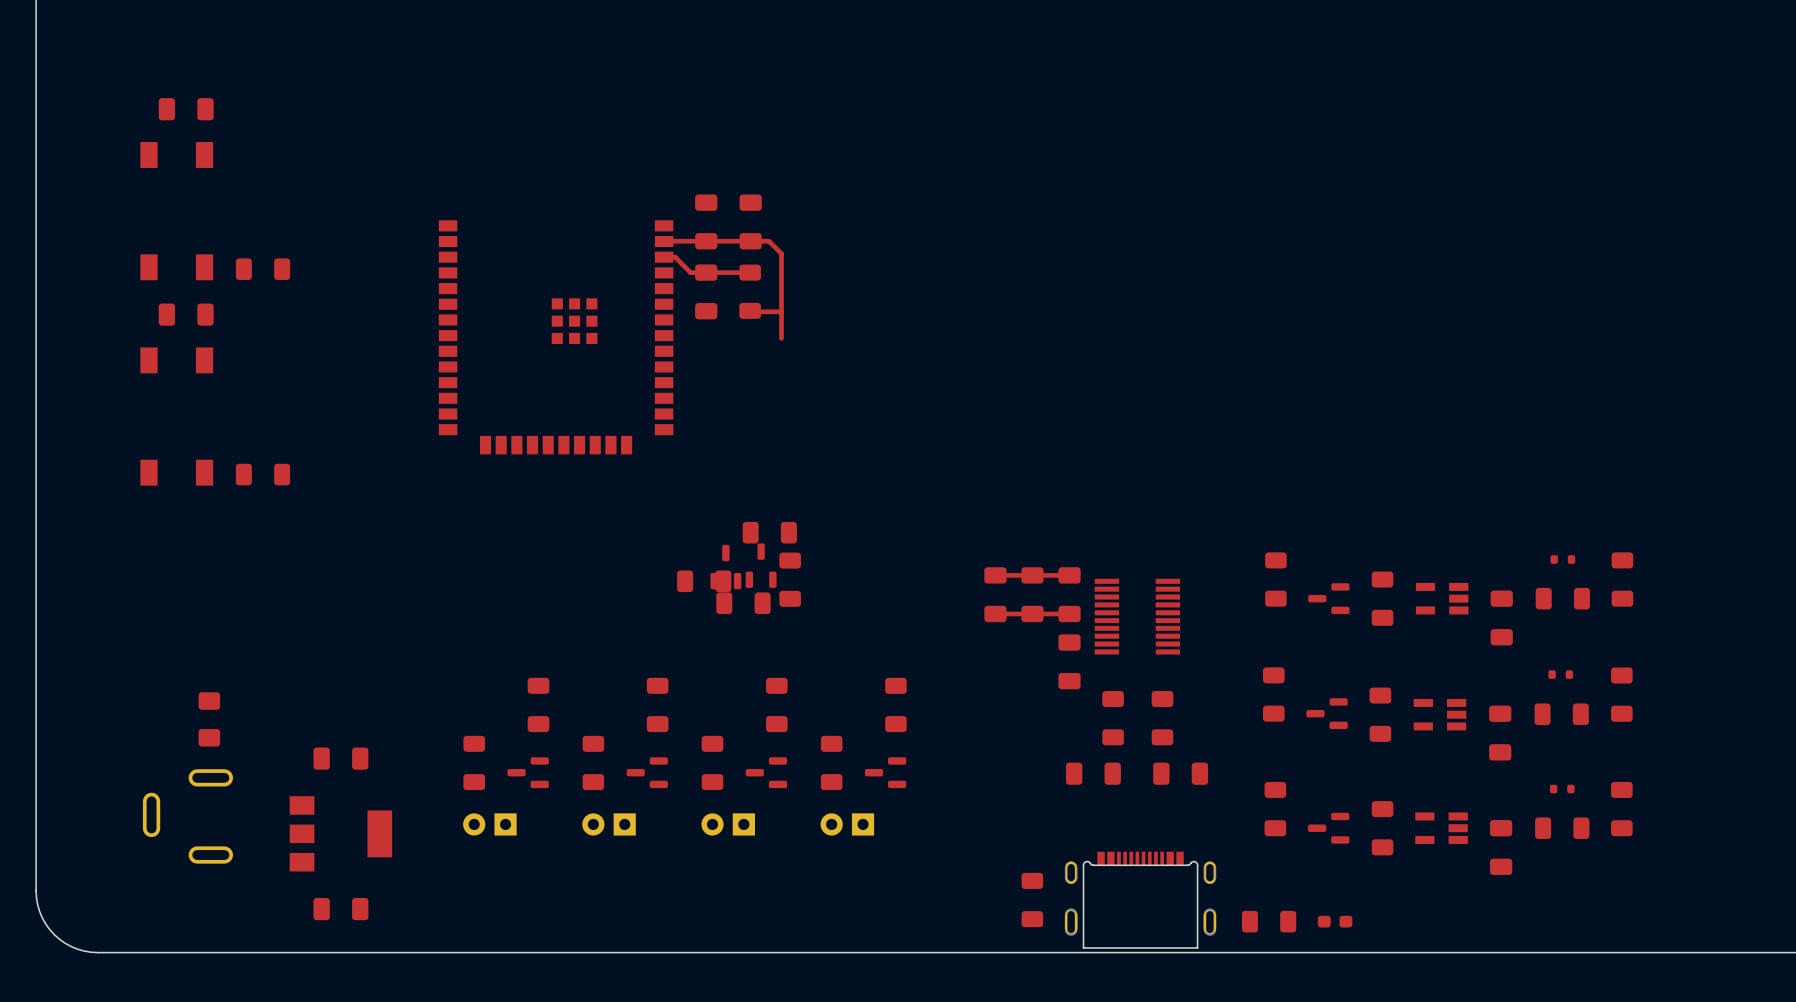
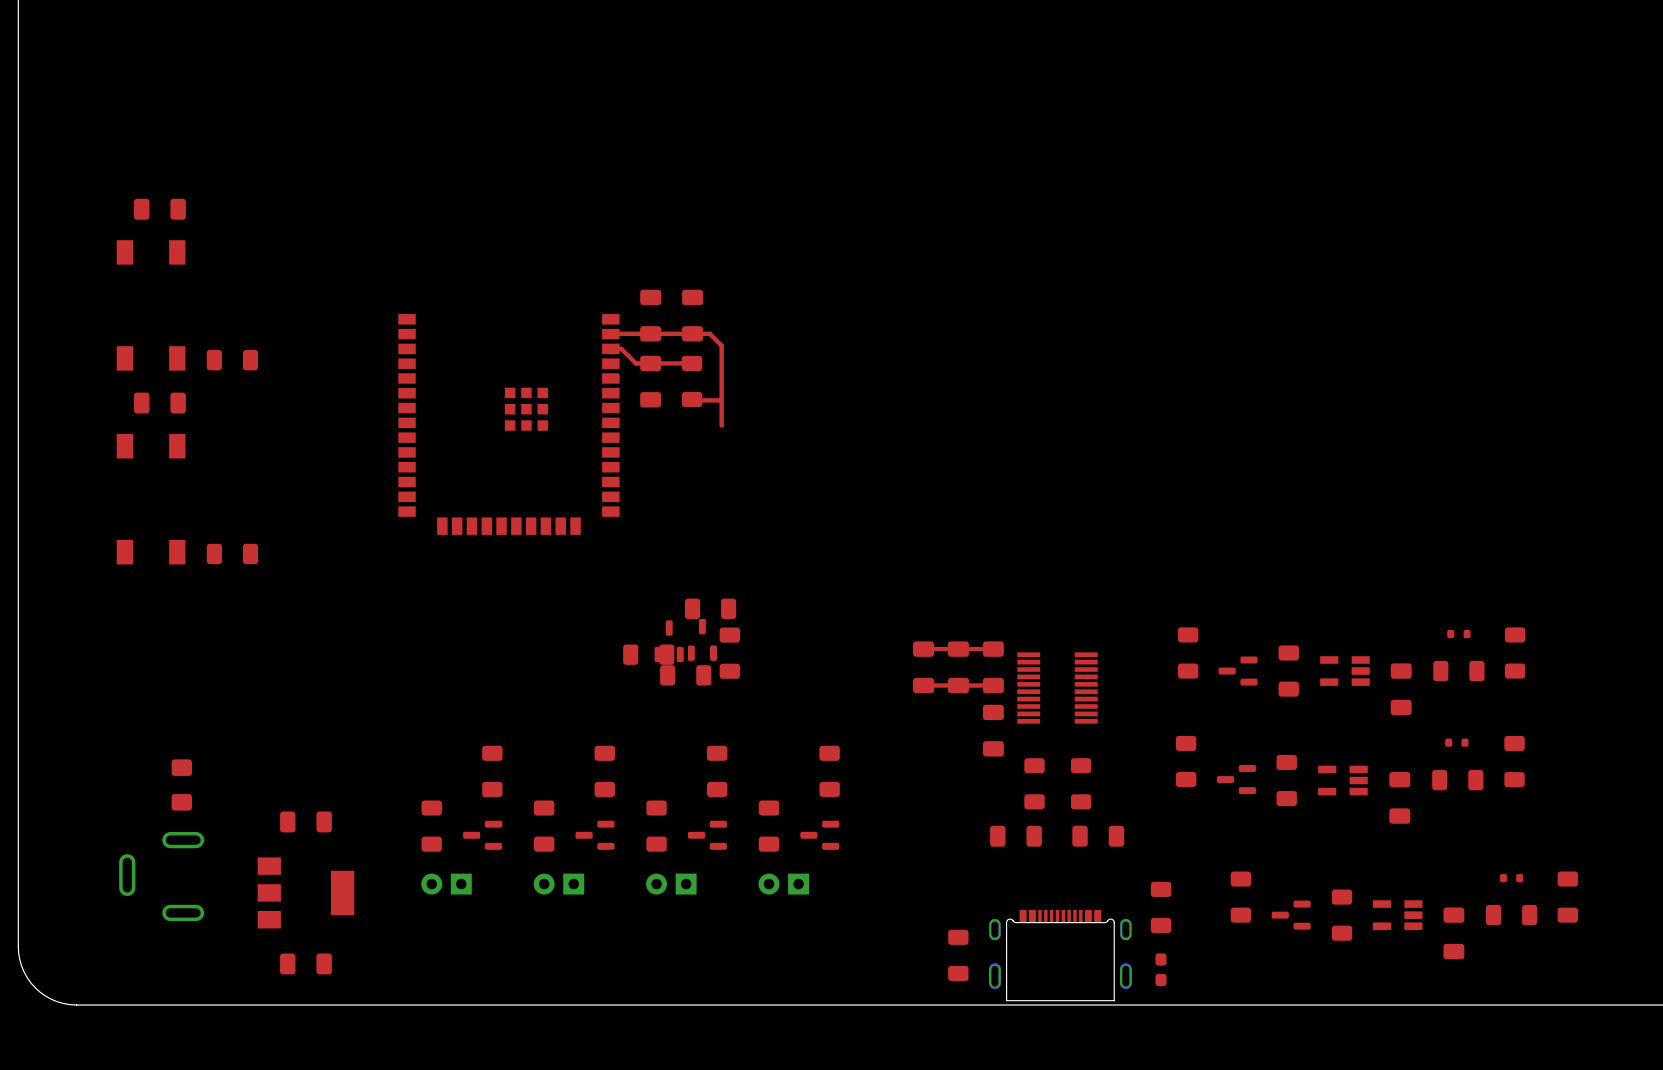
part footprint: [1611, 781, 1633, 837] -> [1499, 874, 1524, 883]
part: (1562, 789) -> none
part: (1275, 809) -> none
part footprint: [1307, 812, 1350, 844] -> [1230, 871, 1252, 923]
part footprint: [1490, 820, 1513, 875] -> [1372, 900, 1423, 930]
part: (1382, 828) -> none
part: (1441, 828) -> none
part: (1562, 828) -> none
part: none -> (1567, 897)
part: none -> (1160, 907)
part: none -> (1291, 915)
part: none -> (1342, 915)
part: none -> (1511, 915)
part: none -> (1453, 933)
part: (1269, 921) -> none
part rotation: 0° (1335, 921) -> 90° clockwise (1160, 969)
part position: (1335, 921) -> (1160, 969)

